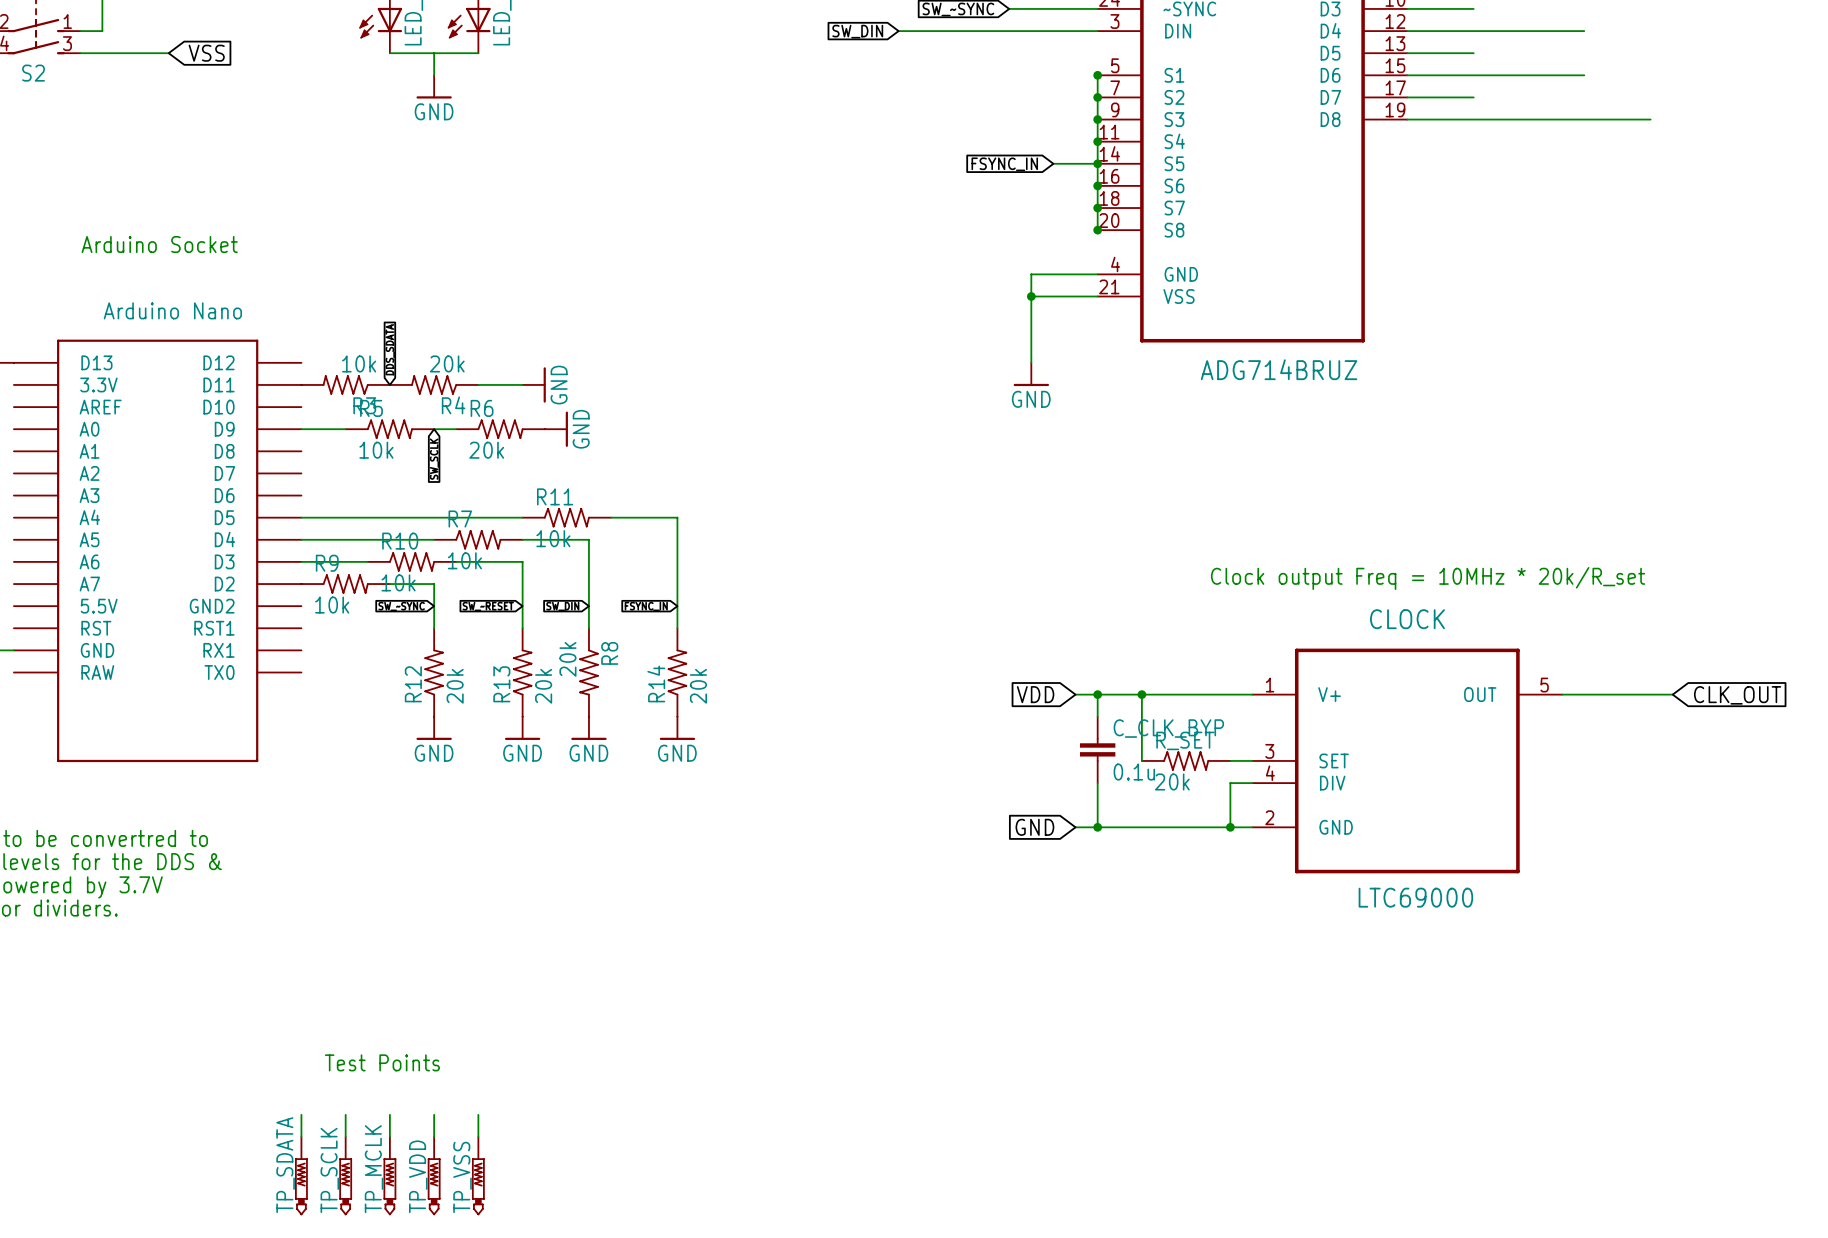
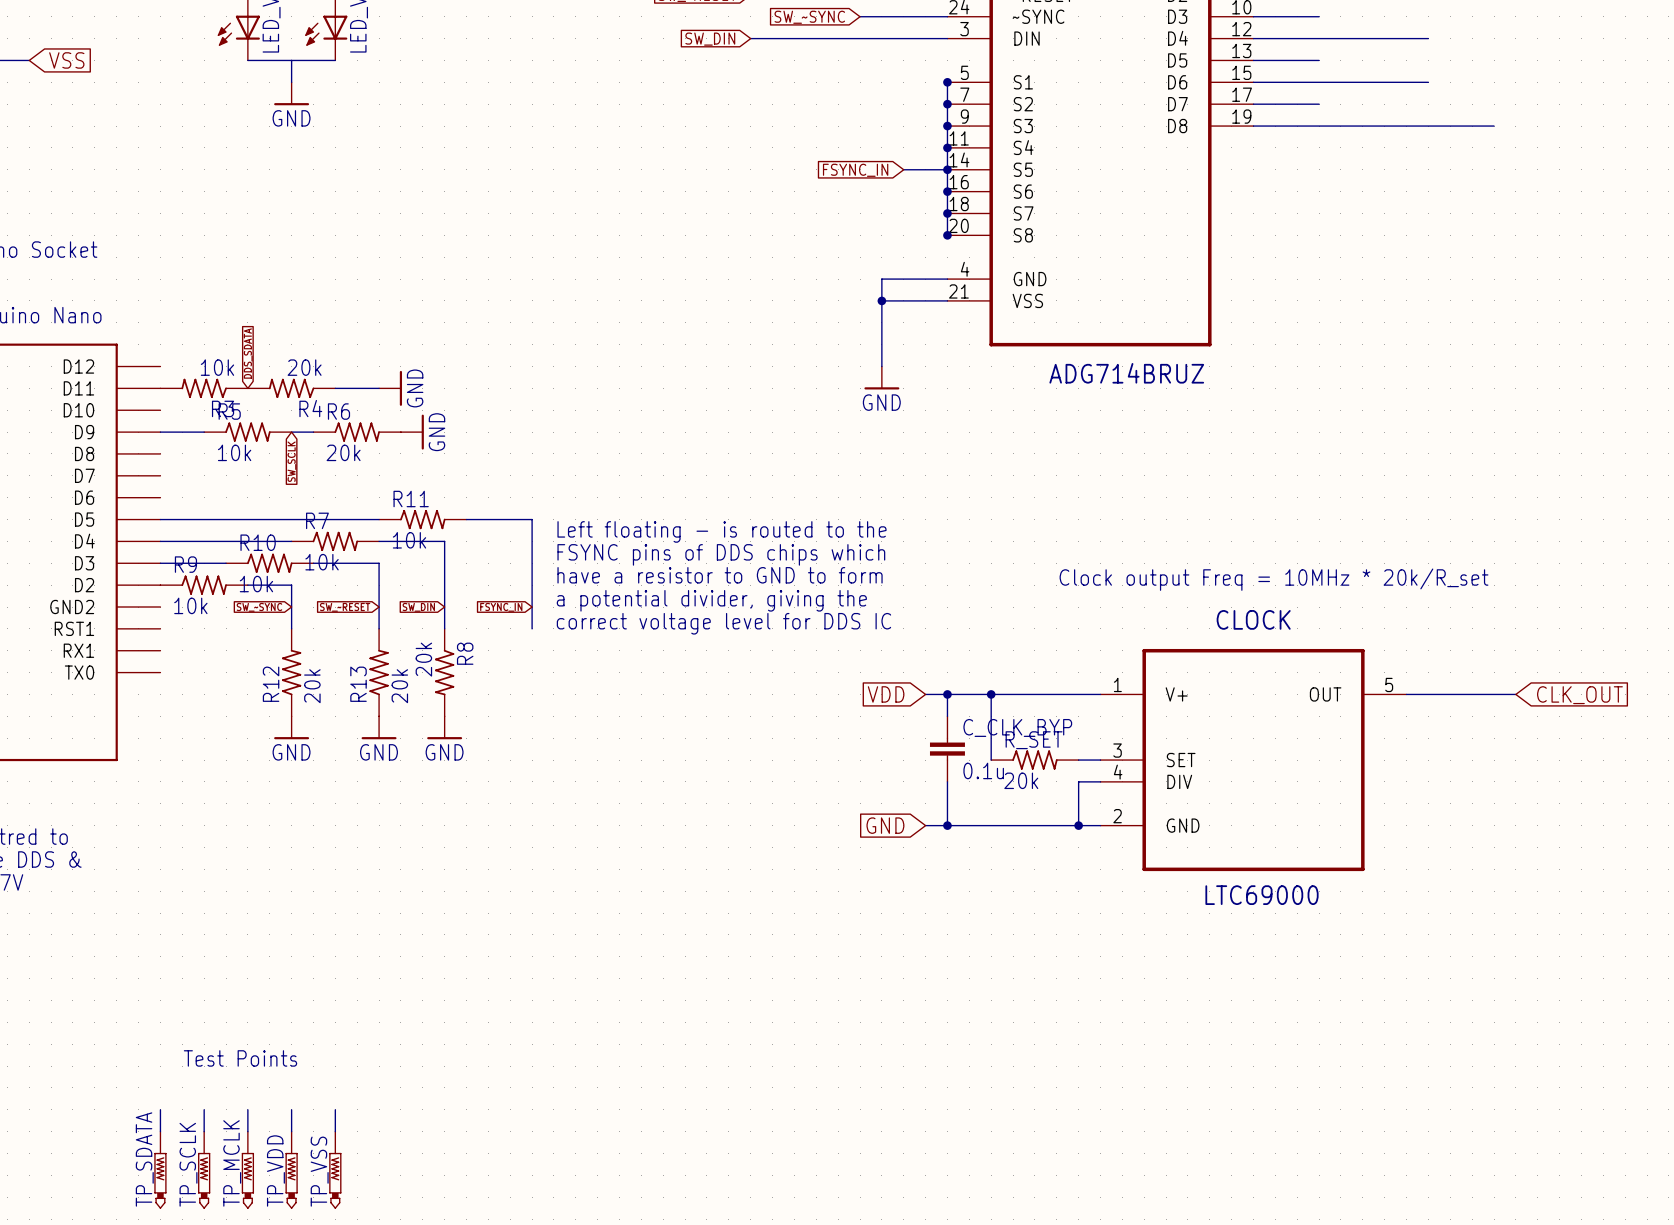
text: none -> Left floating - is routed to the (722, 531)
text: none -> FSYNC pins of DDS chips which (721, 554)
text: none -> have a resistor to GND to form (720, 575)
text: none -> a potential divider, giving the (711, 600)
text: none -> correct voltage level for DDS IC (723, 623)
R14: 20k (677, 672) -> none
power symbol: GND (677, 728) -> none

